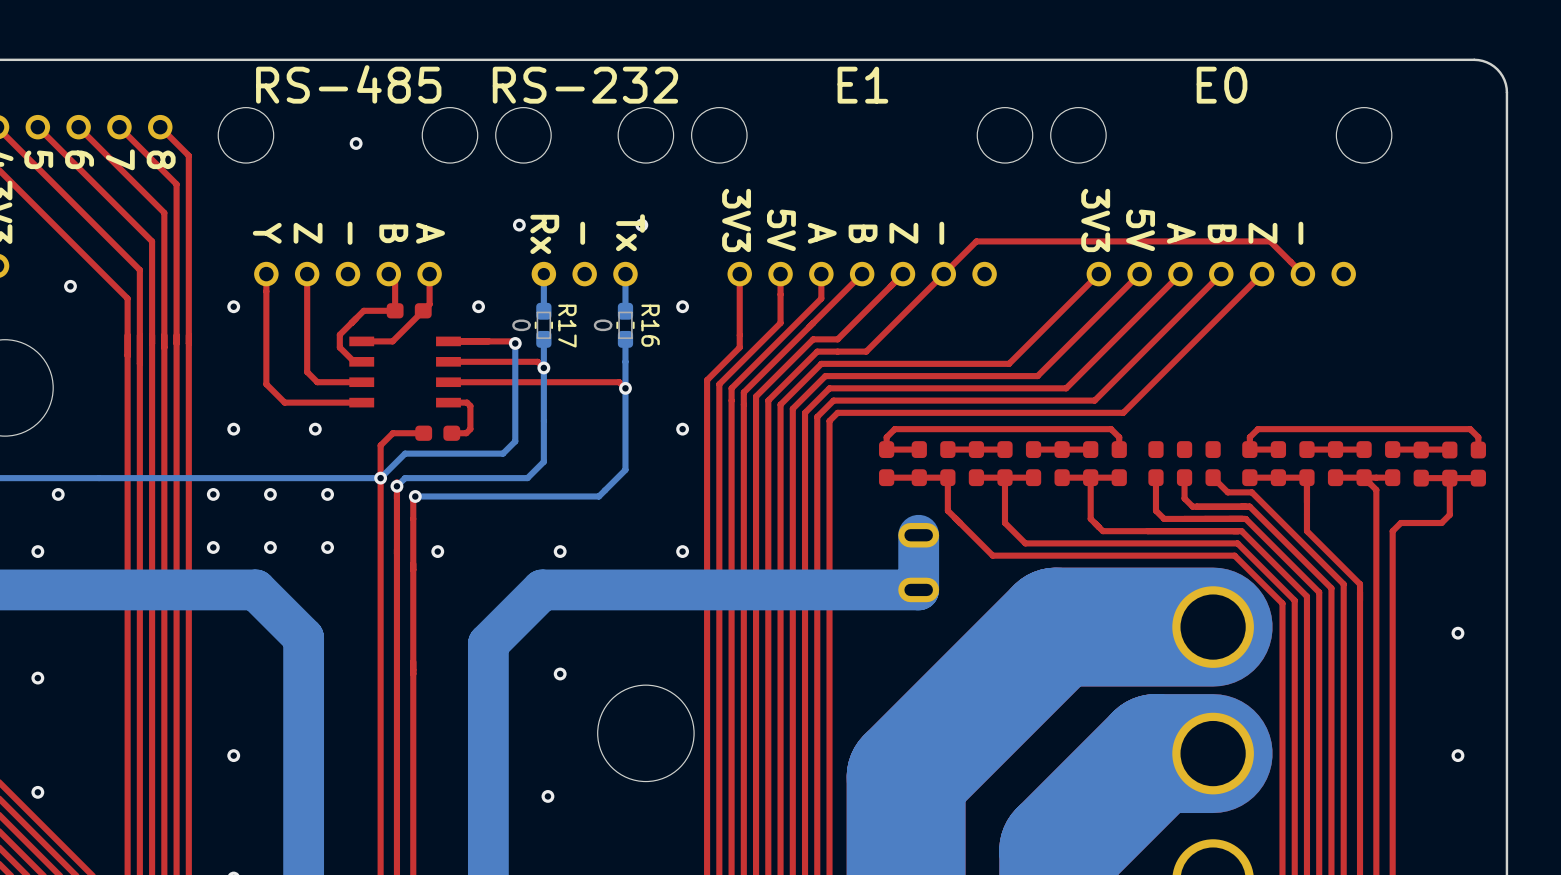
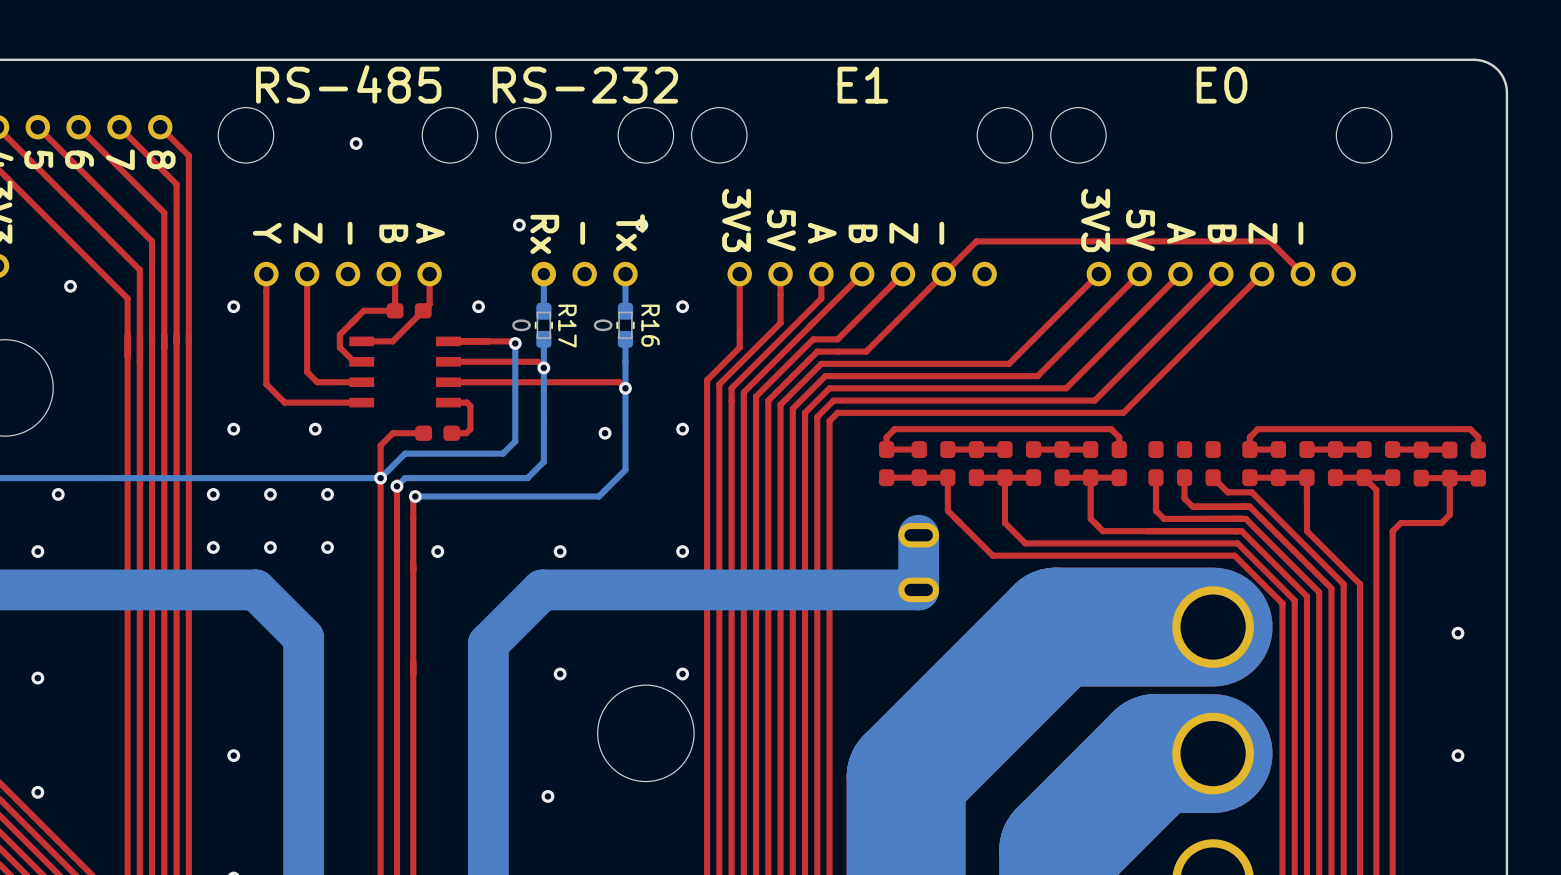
via: none -> (605, 433)
via: none -> (682, 674)

